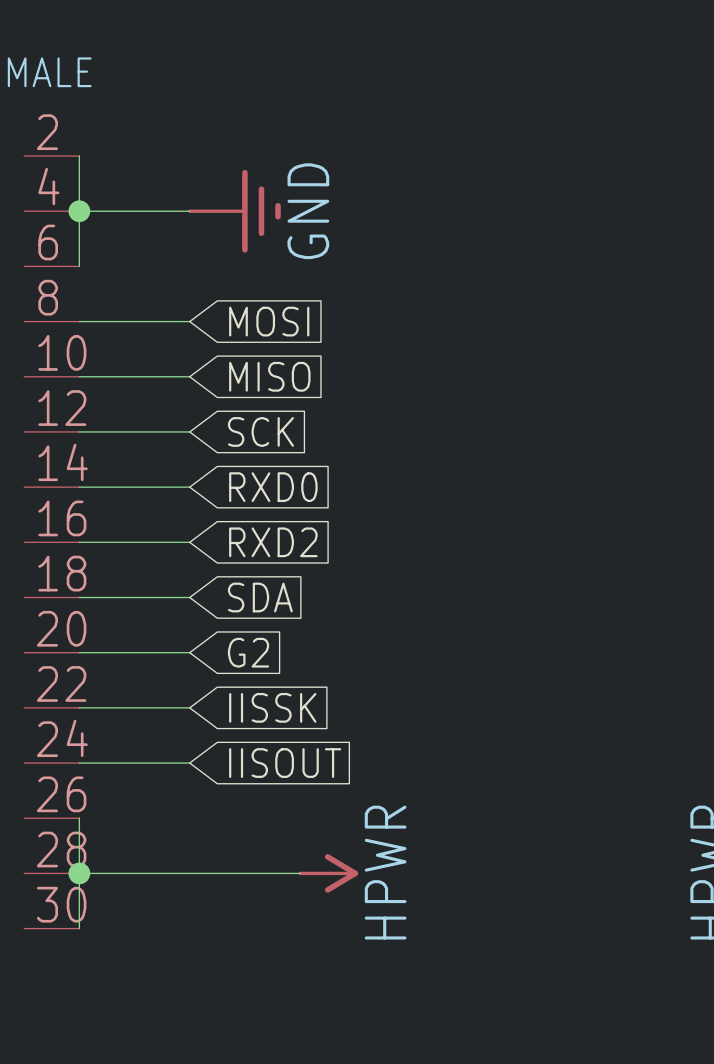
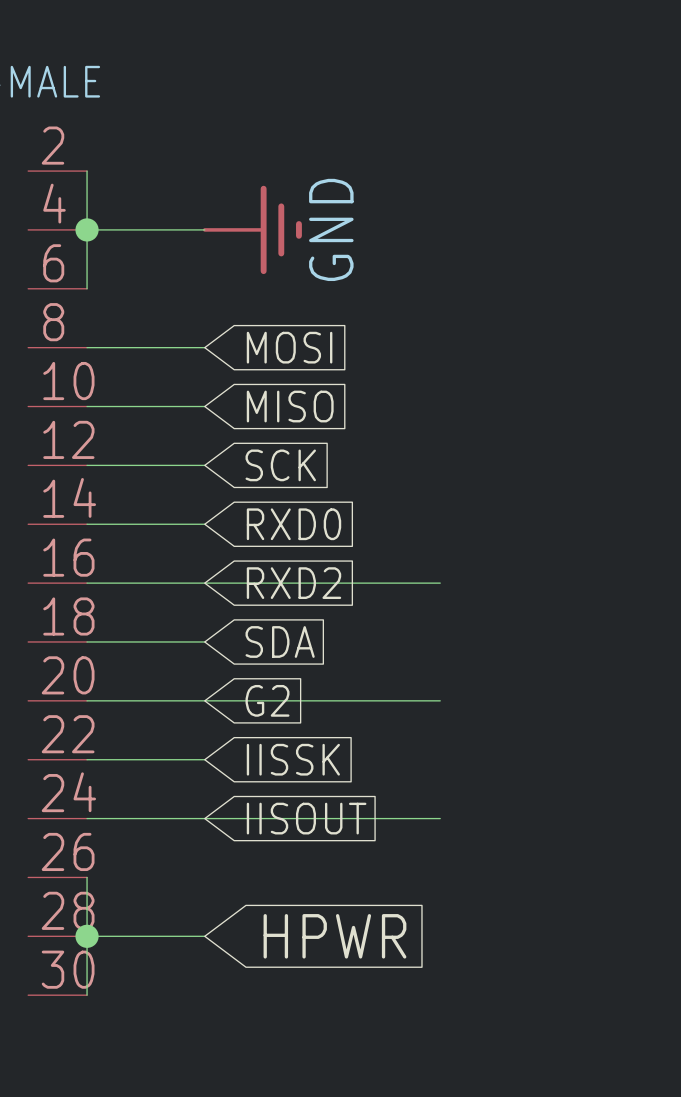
wire: none -> (204, 583) (440, 583)
wire: none -> (204, 700) (440, 700)
wire: none -> (204, 818) (440, 818)
wire: (189, 873) (300, 873) -> none
global label: none -> HPWR (334, 936)
power symbol: HPWR (328, 873) -> none

